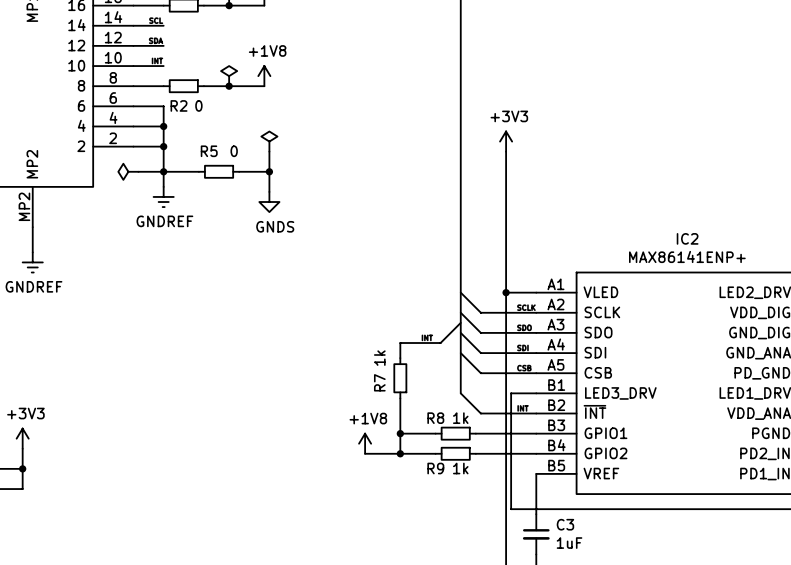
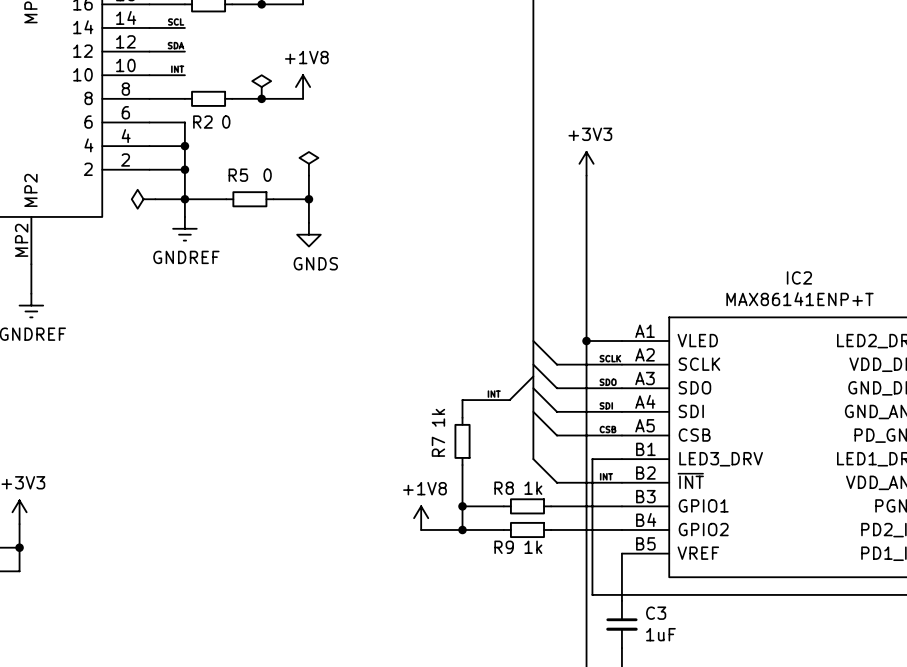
IC2 value: MAX86141ENP+ (687, 256) -> MAX86141ENP+T (799, 299)

